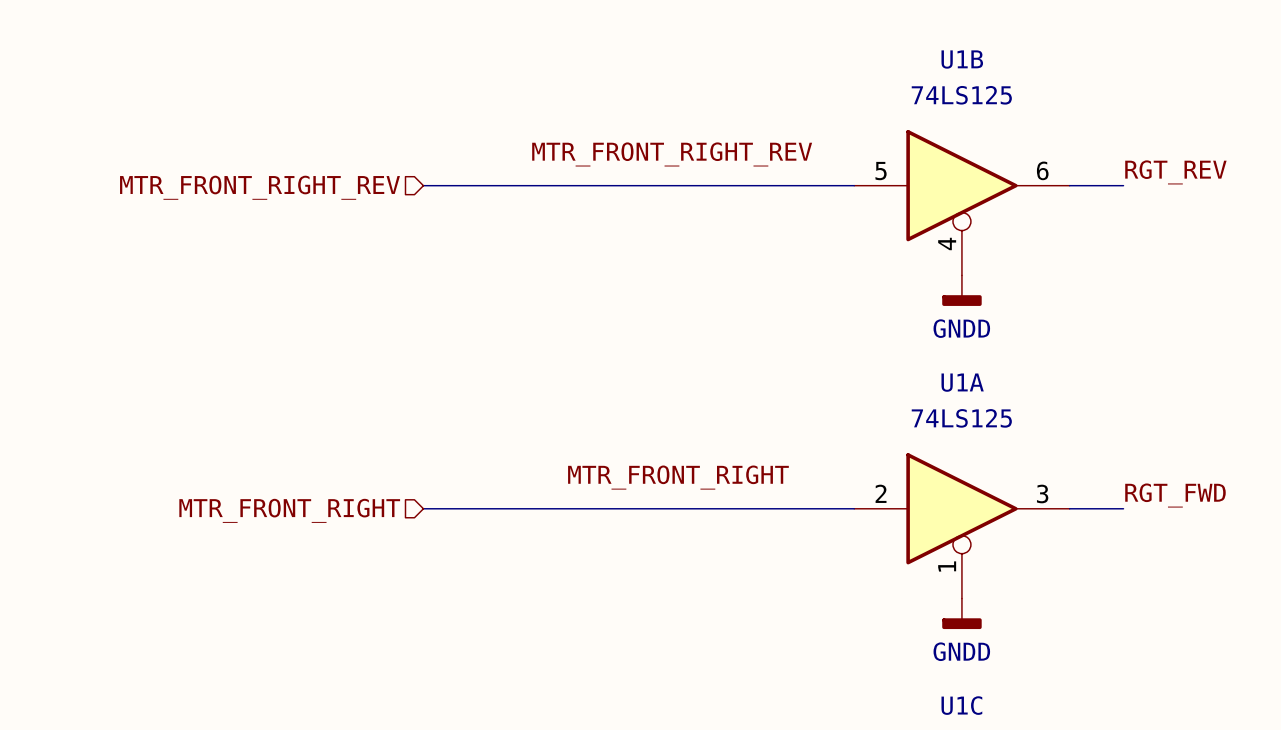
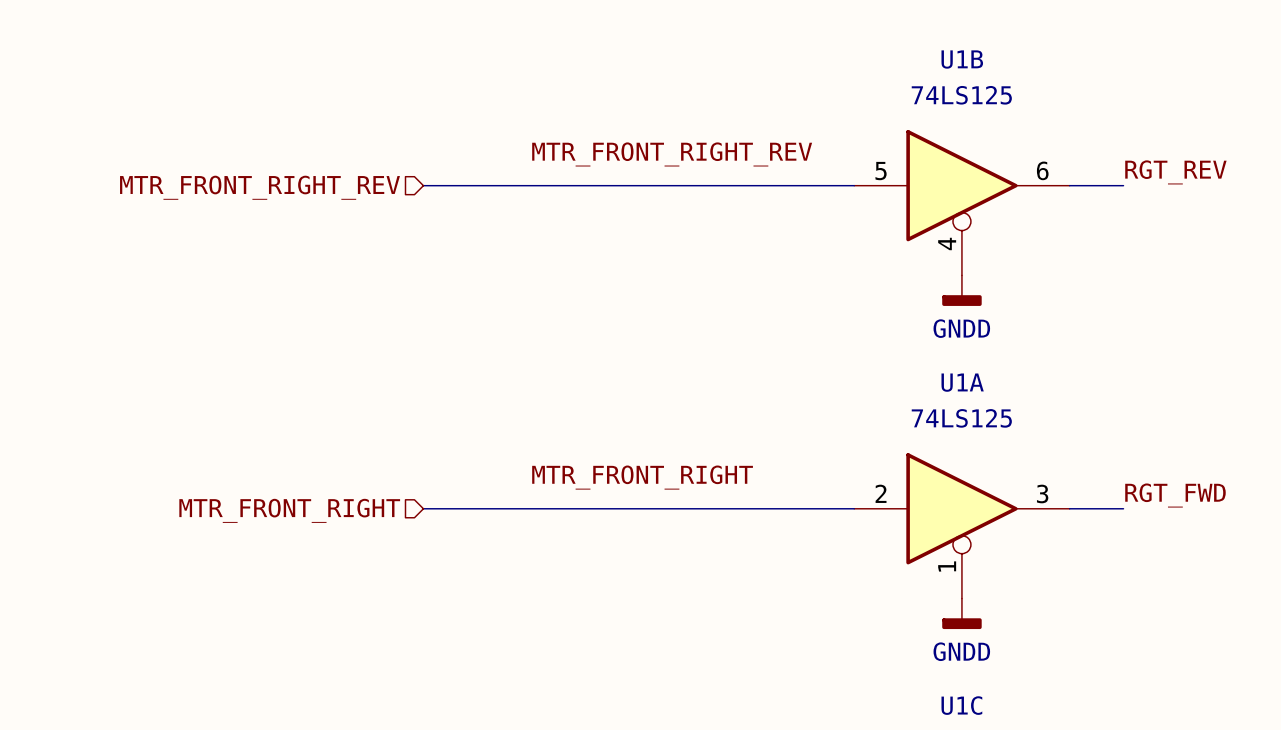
label position: MTR_FRONT_RIGHT (678, 477) -> MTR_FRONT_RIGHT (642, 477)

